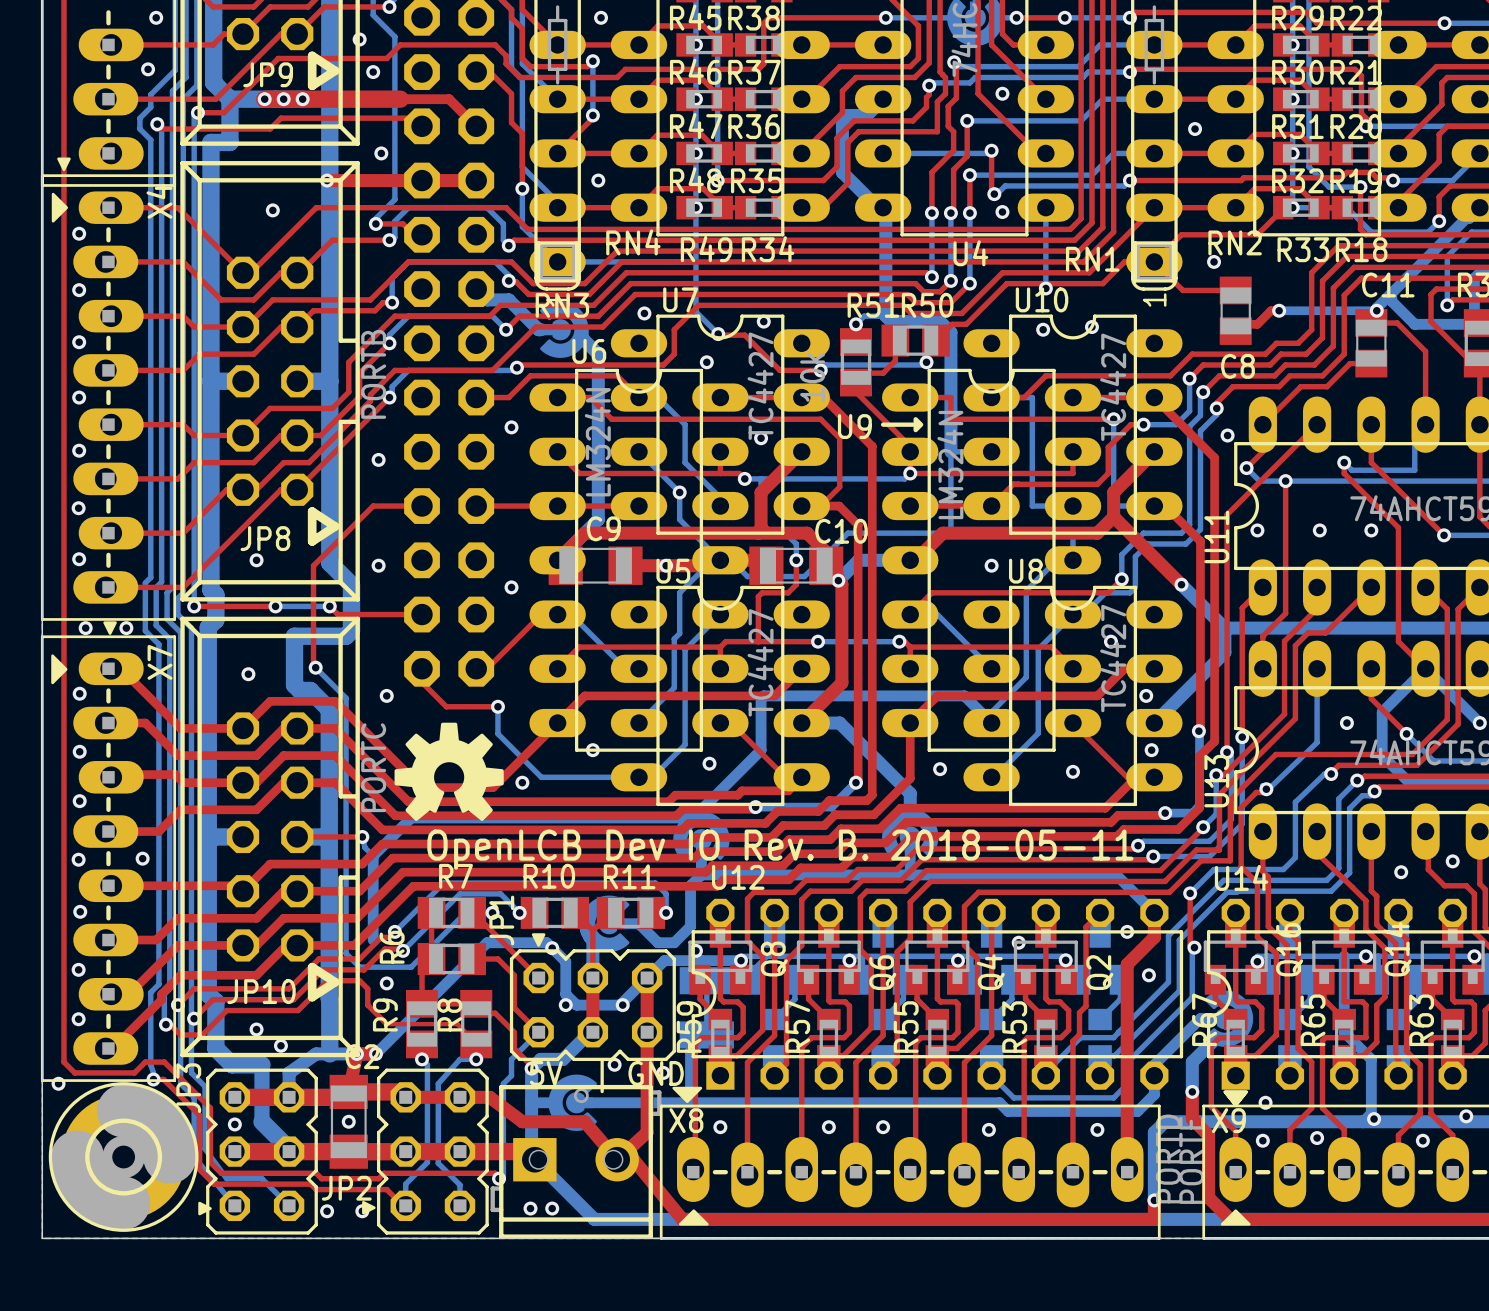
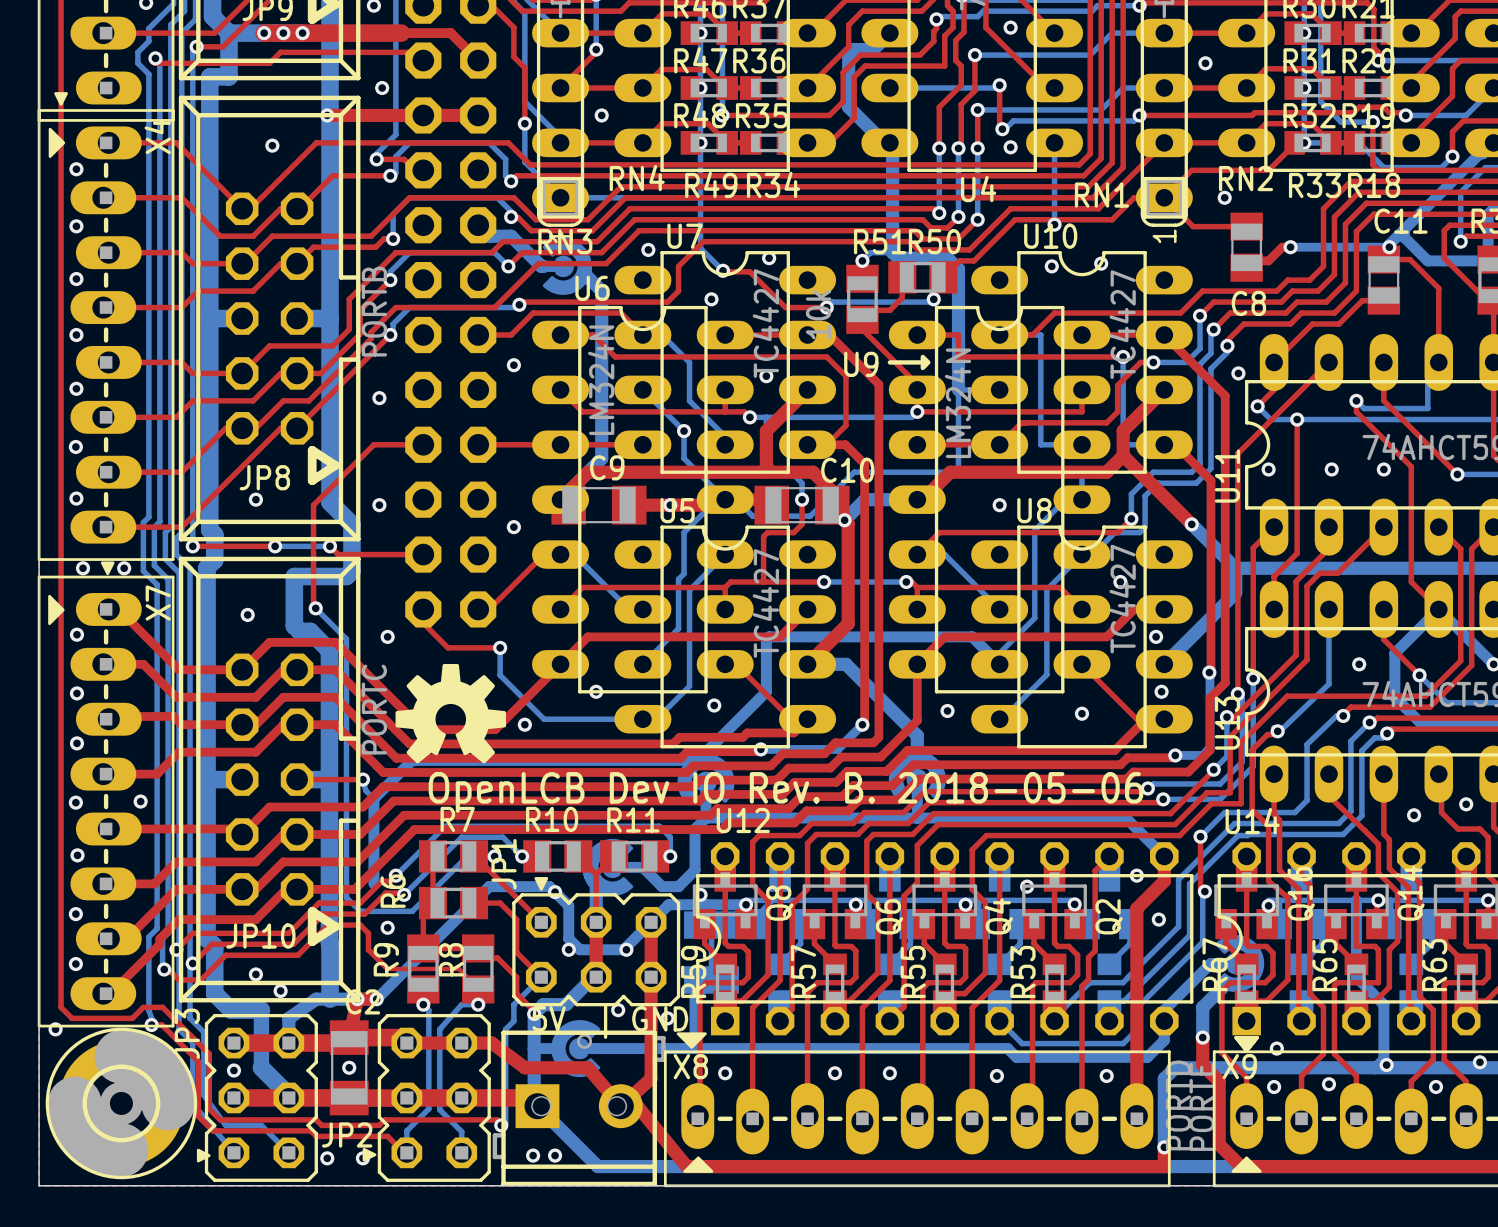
text: OpenLCB Dev IO Rev. B. 2018-05-11 (780, 849) -> OpenLCB Dev IO Rev. B. 2018-05-06 (785, 792)

